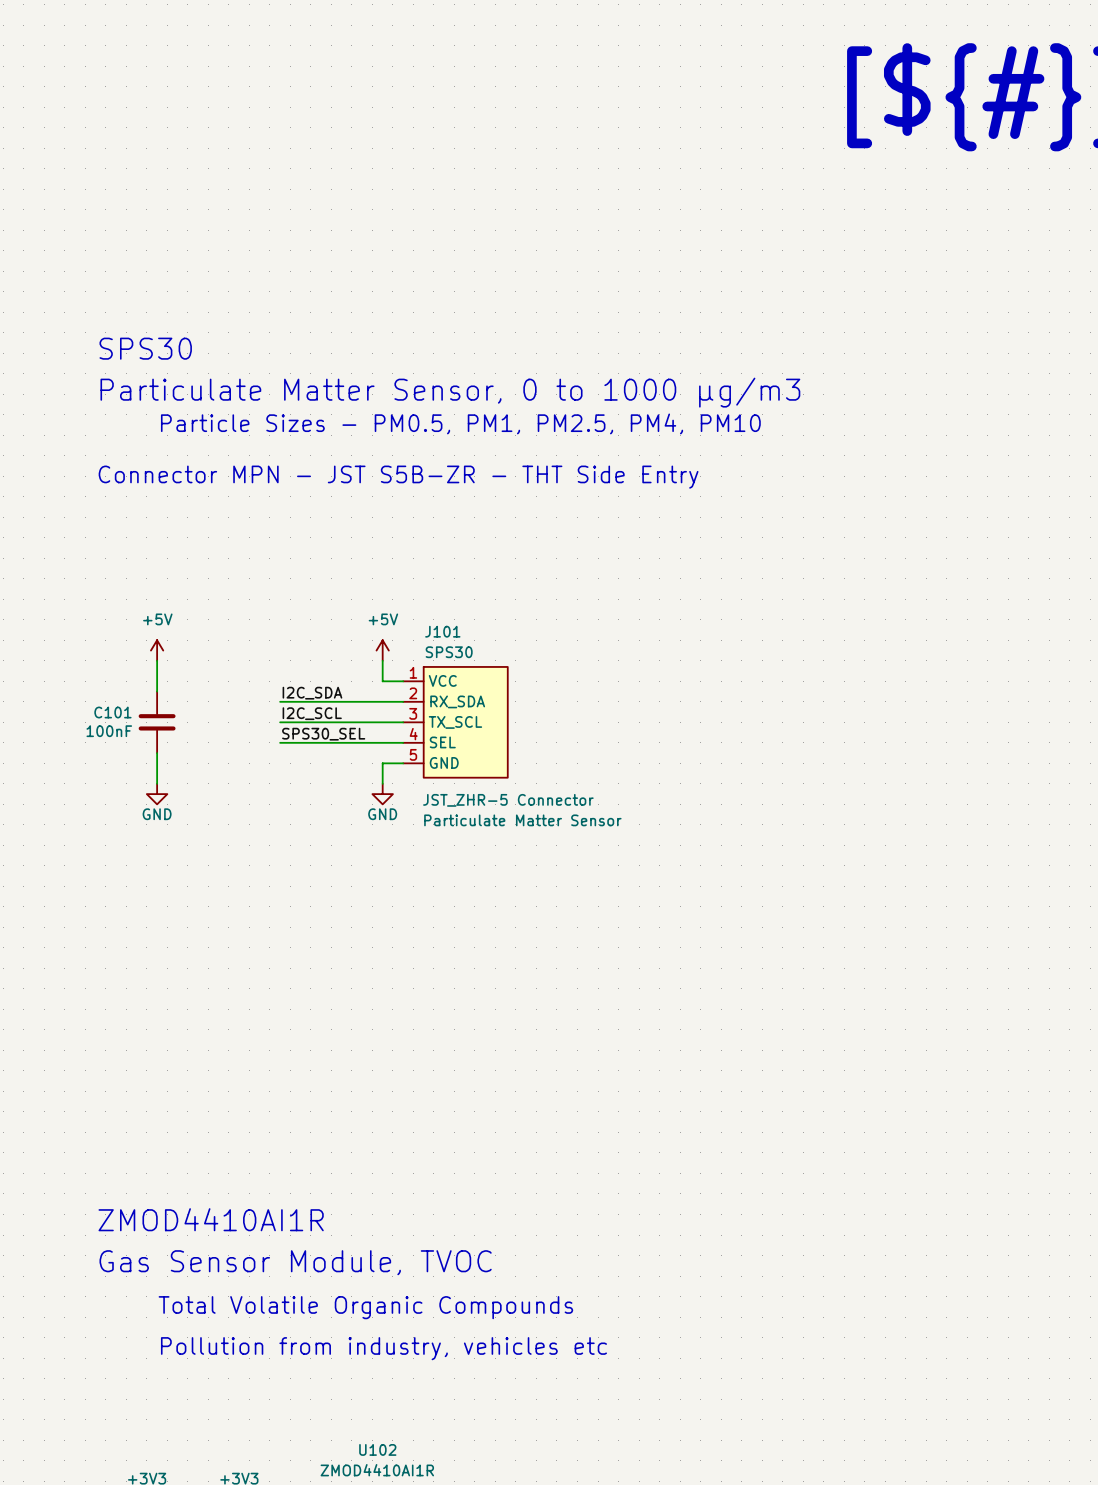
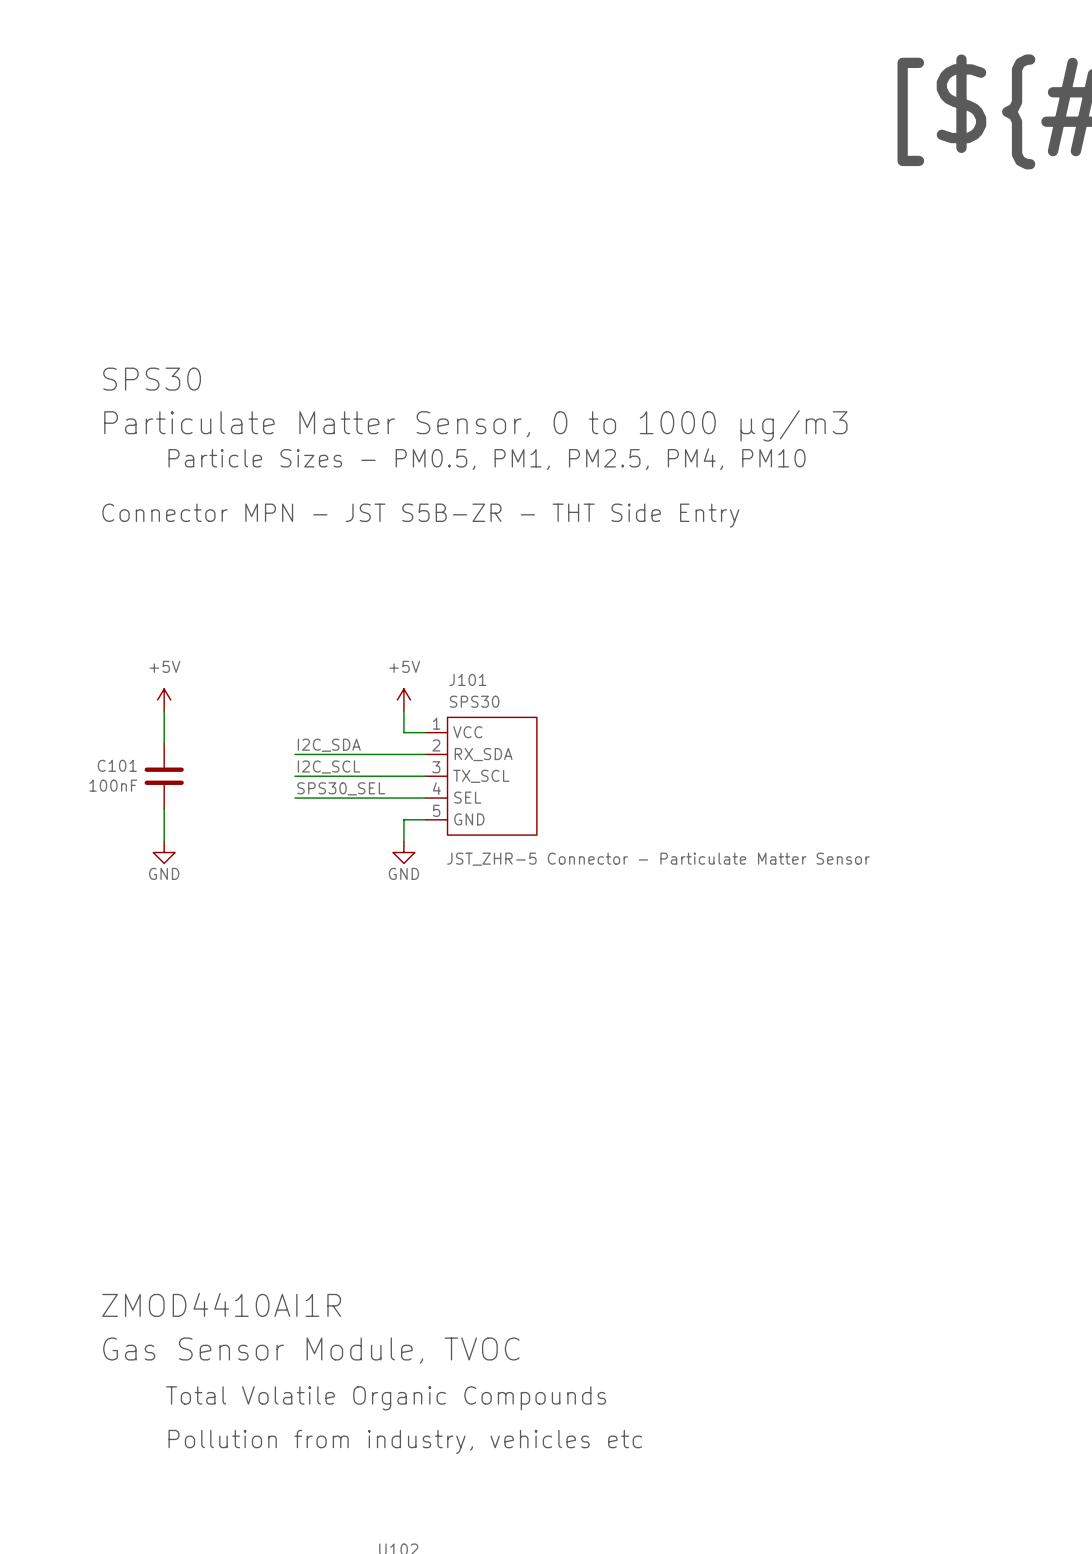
J101 text: JST_ZHR-5 Connector (508, 800) -> JST_ZHR-5 Connector - Particulate Matter Sensor (658, 859)
J101 text: Particulate Matter Sensor (522, 820) -> none

